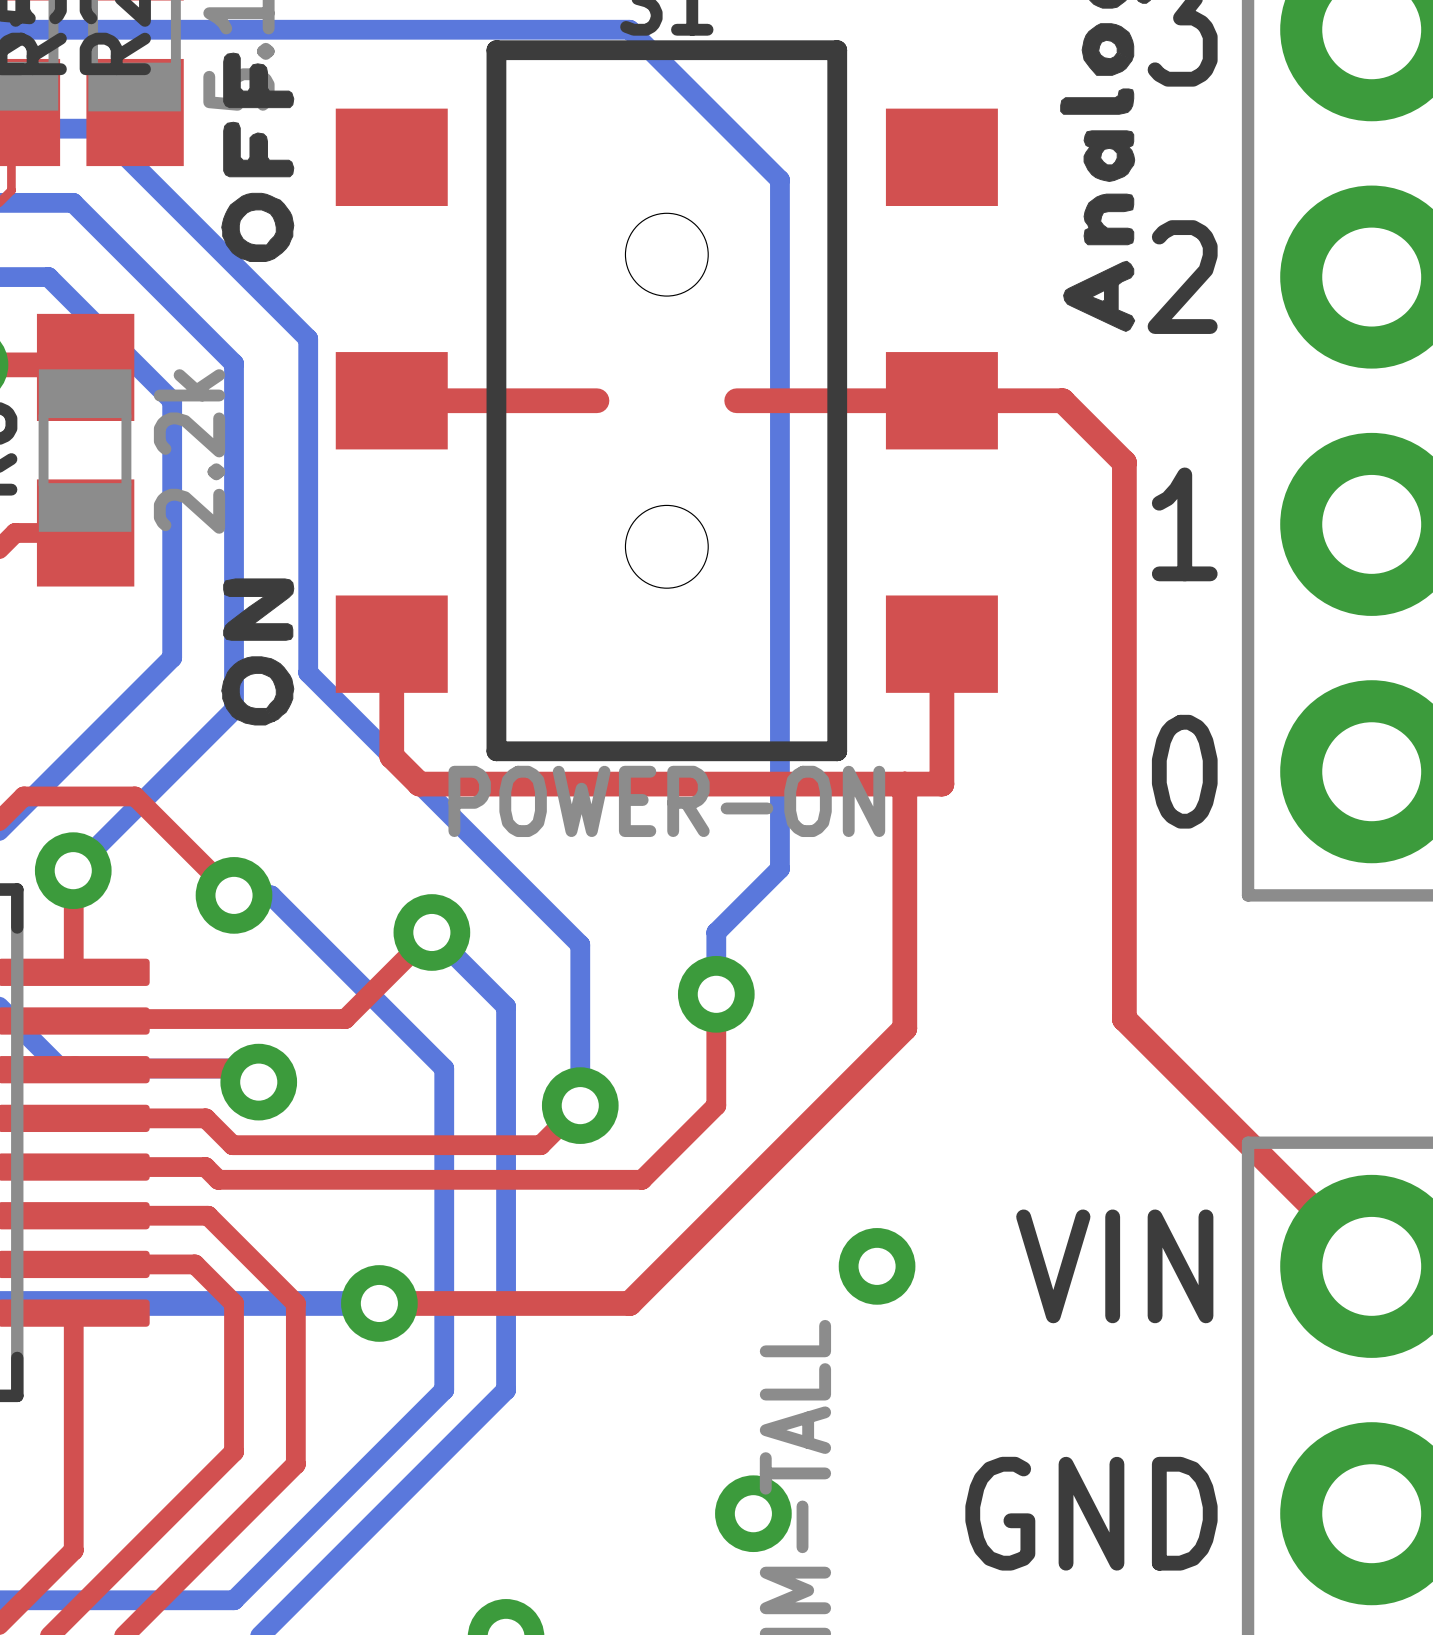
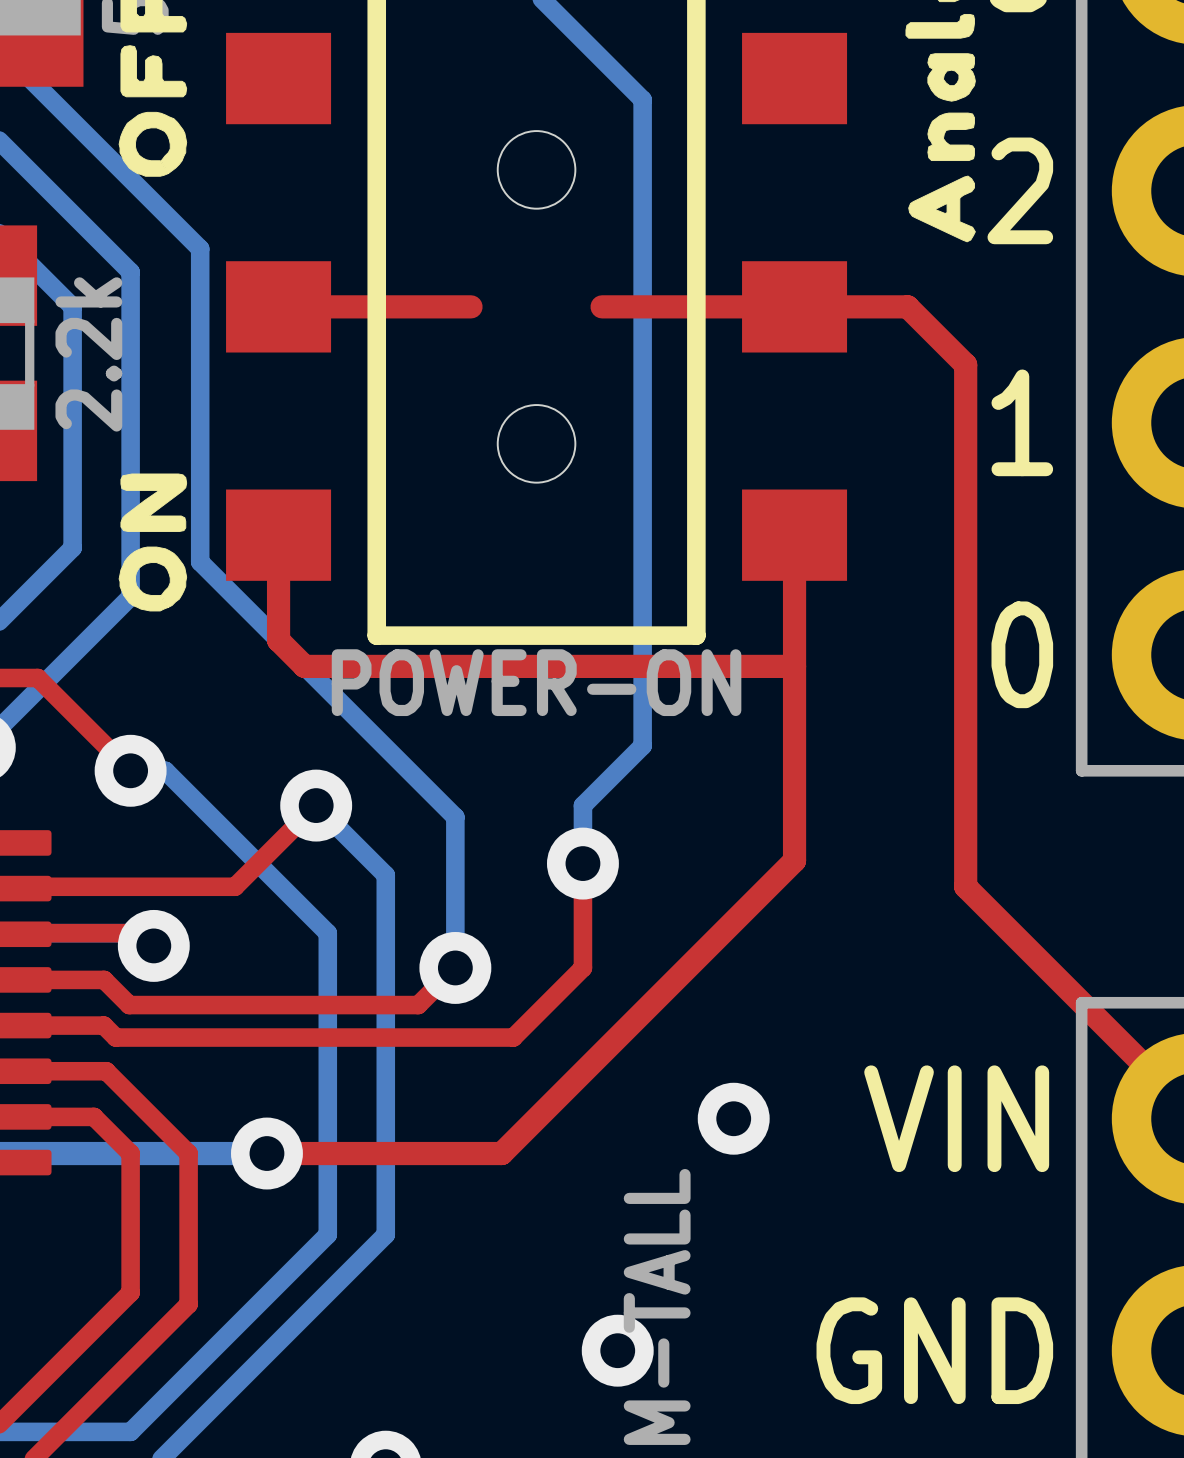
top track: (904, 784) (904, 1028) -> (794, 666) (794, 860) (759, 895)

